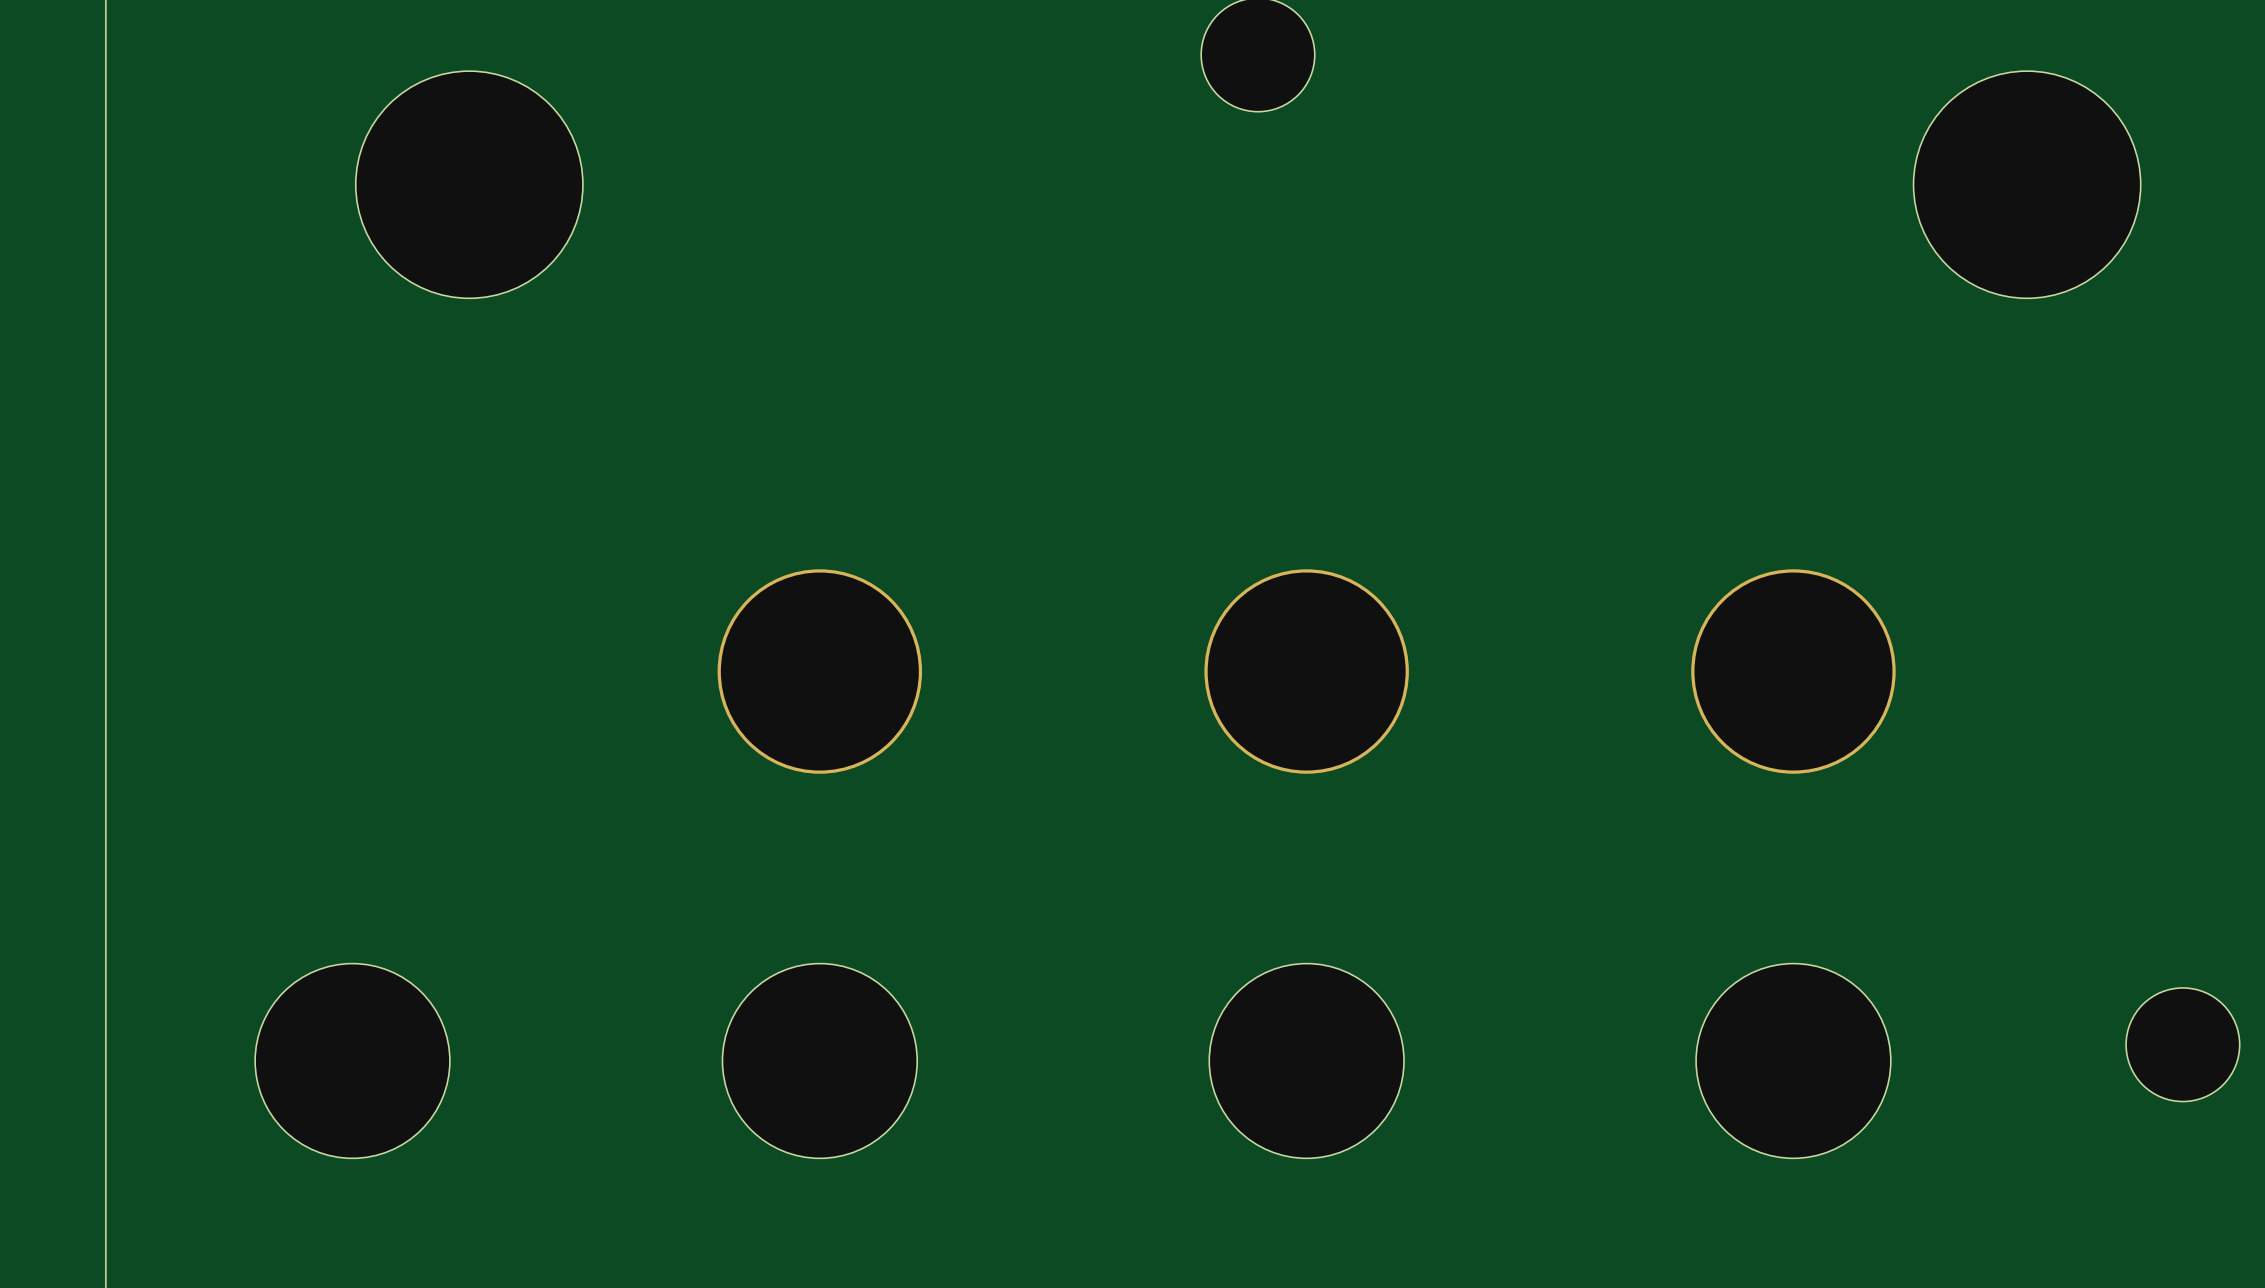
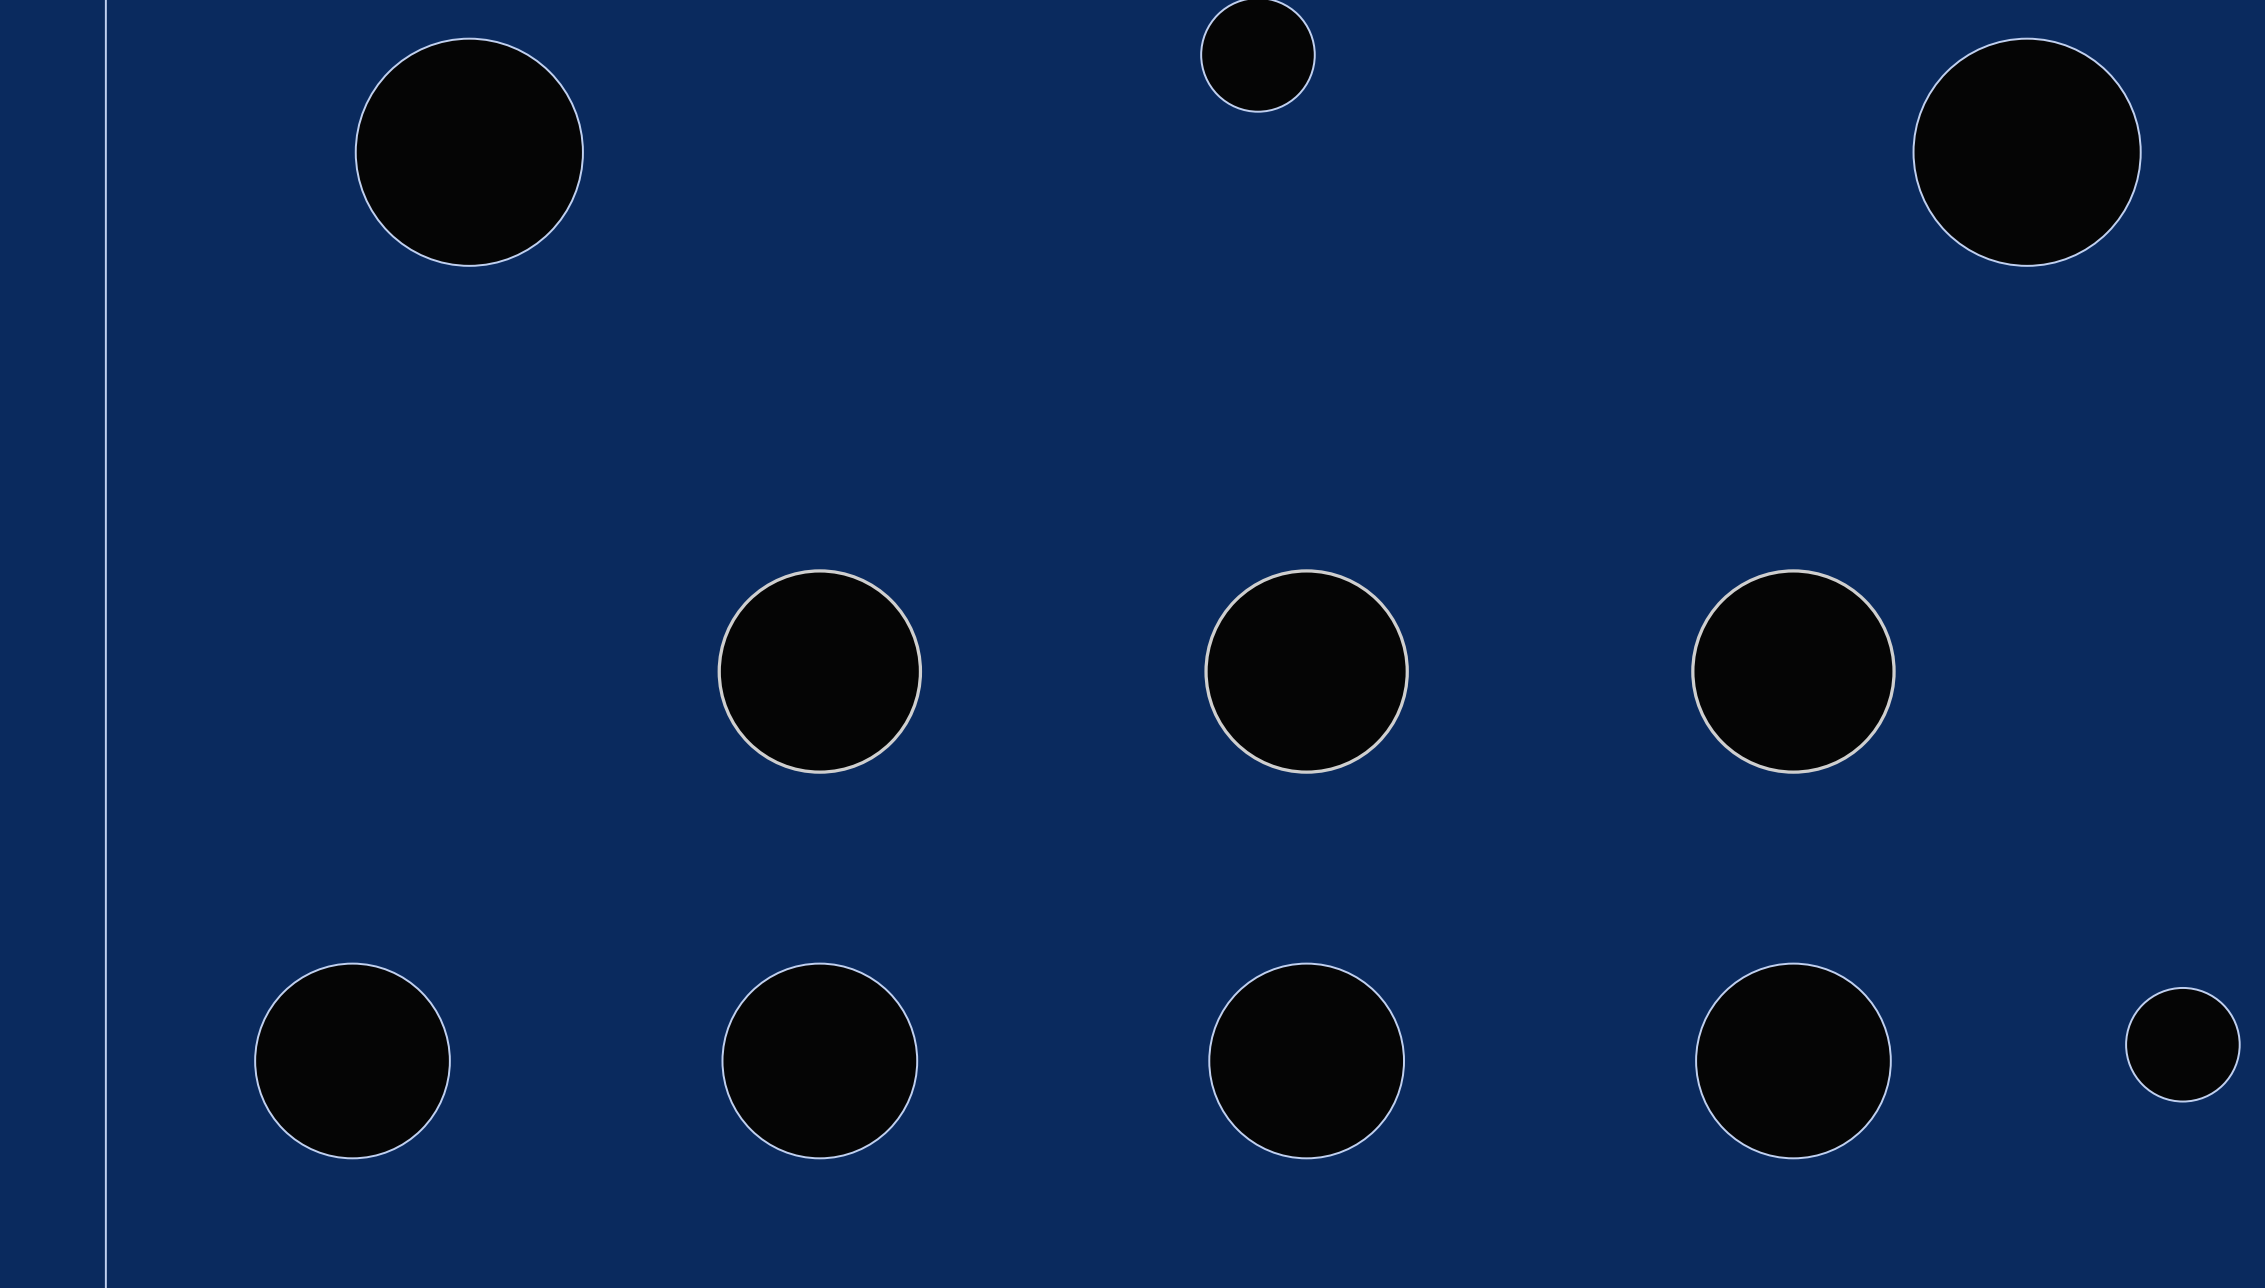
part position: (469, 184) -> (469, 152)
part position: (2027, 184) -> (2027, 152)

